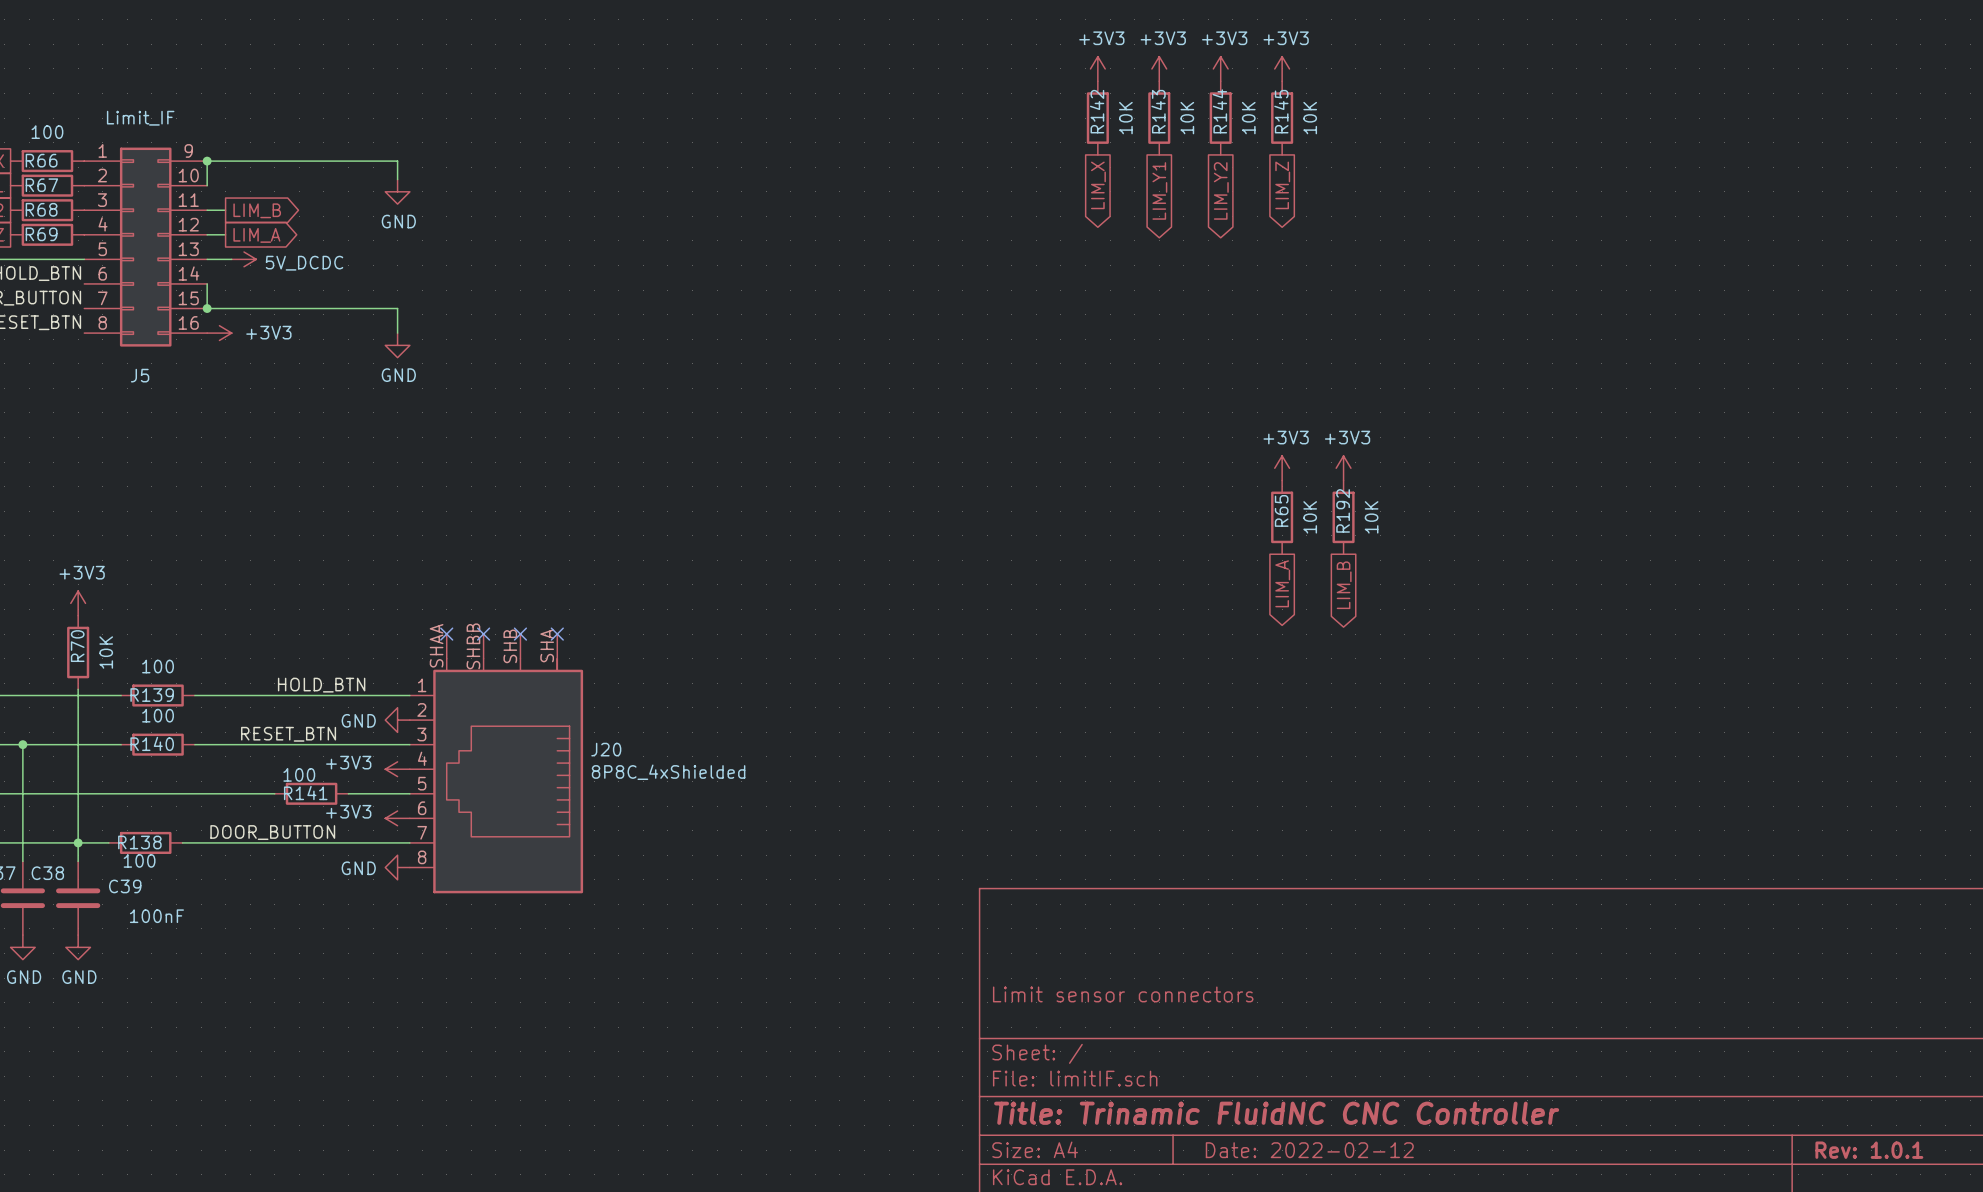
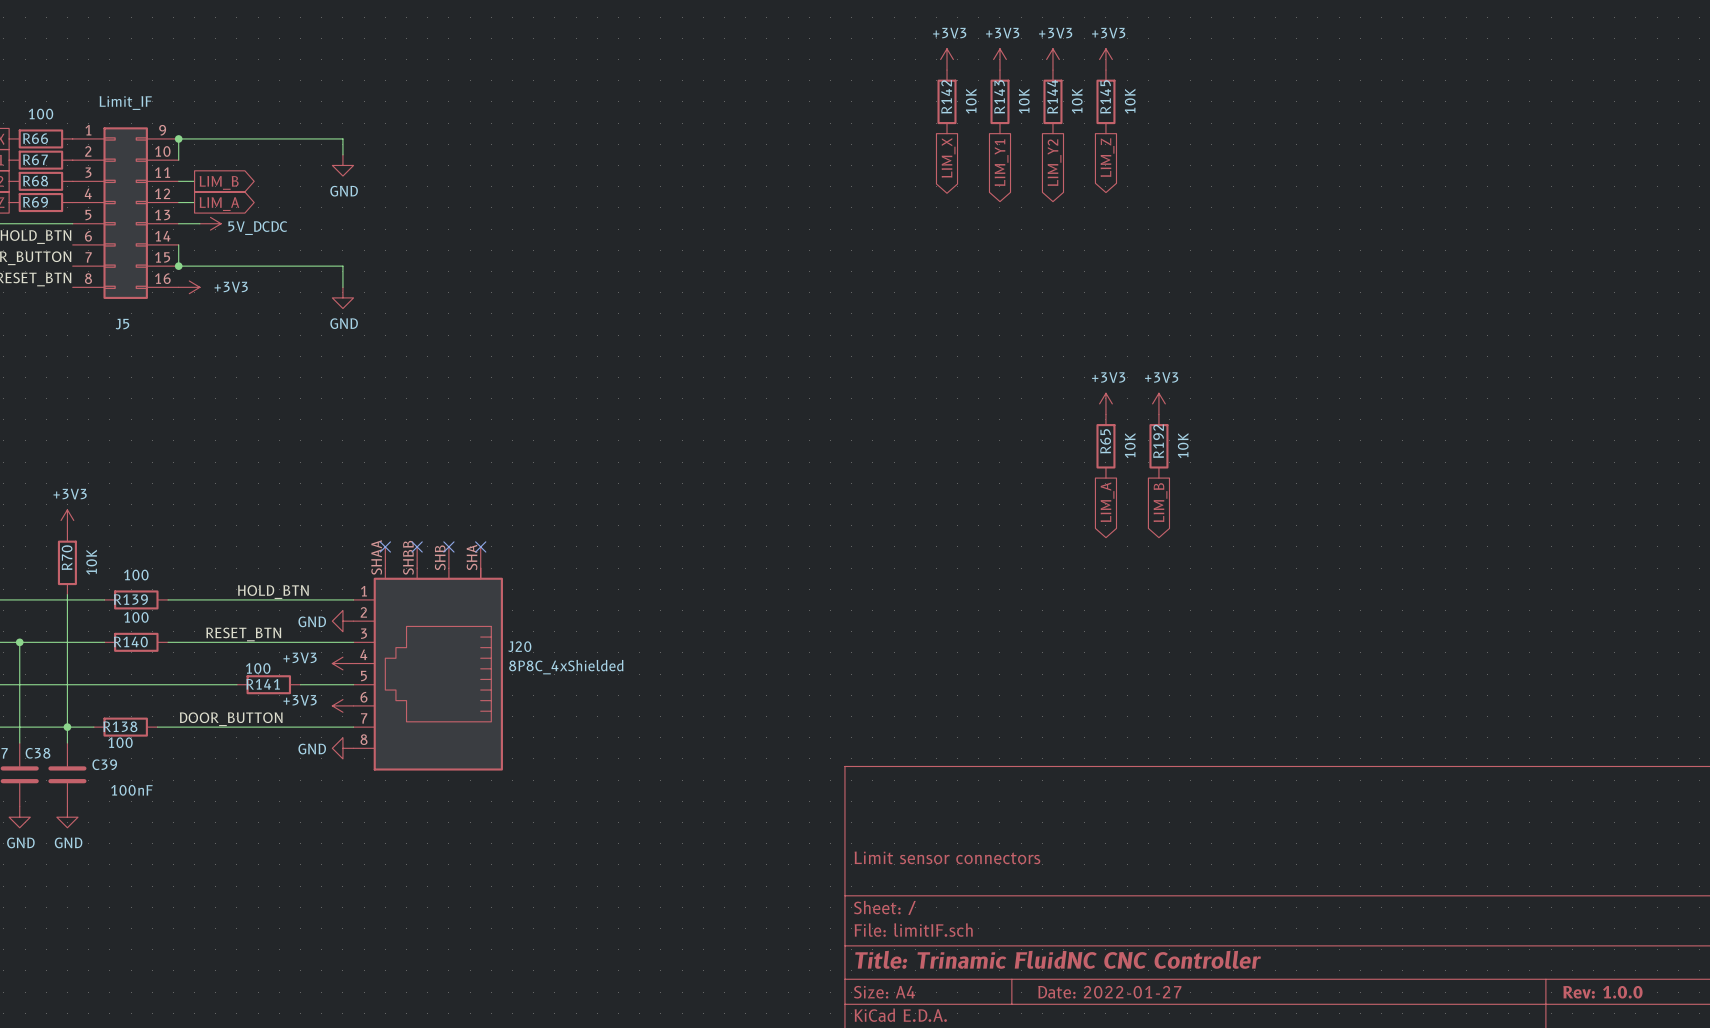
title block: Date: 2022-02-12 (1309, 1150) -> Date: 2022-01-27 (1109, 992)
title block: Rev: 1.0.1 (1869, 1150) -> Rev: 1.0.0 (1602, 992)

